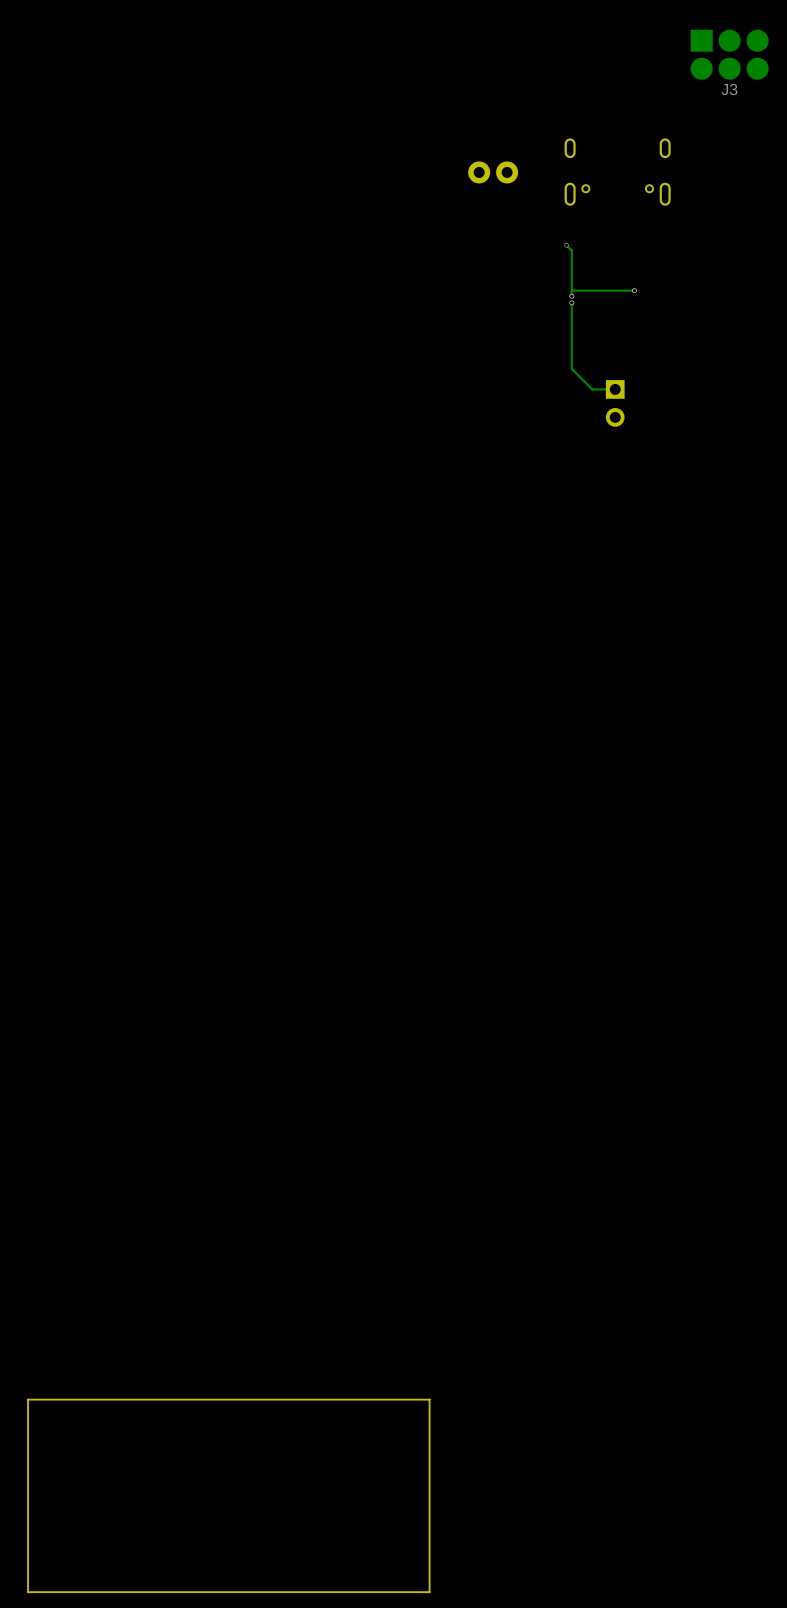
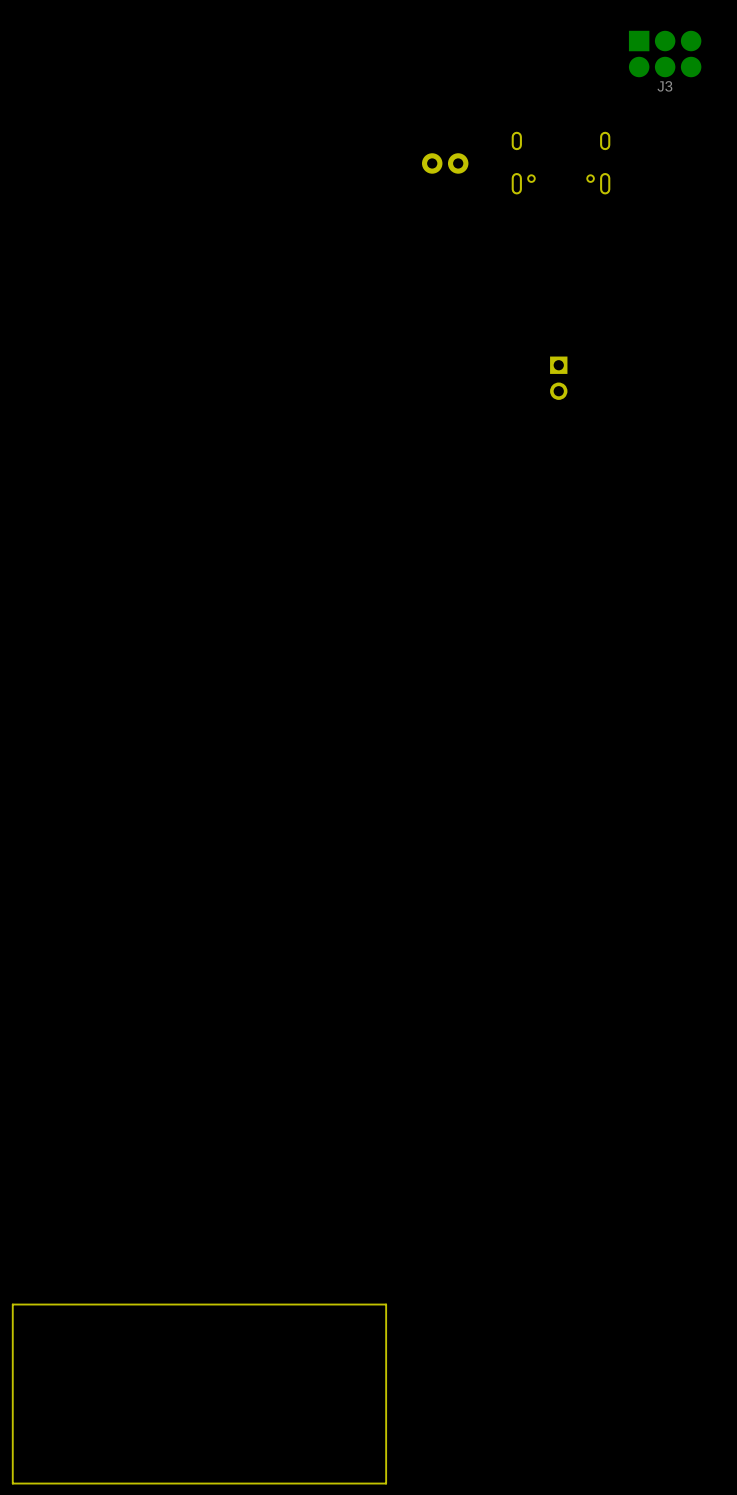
track: (566, 245) (571, 250) (571, 296) -> none
via: (566, 245) -> none
track: (634, 290) (571, 290) -> none
via: (634, 290) -> none
via: (571, 296) -> none
track: (571, 302) (571, 368) (592, 389) (615, 389) -> none
via: (571, 302) -> none

